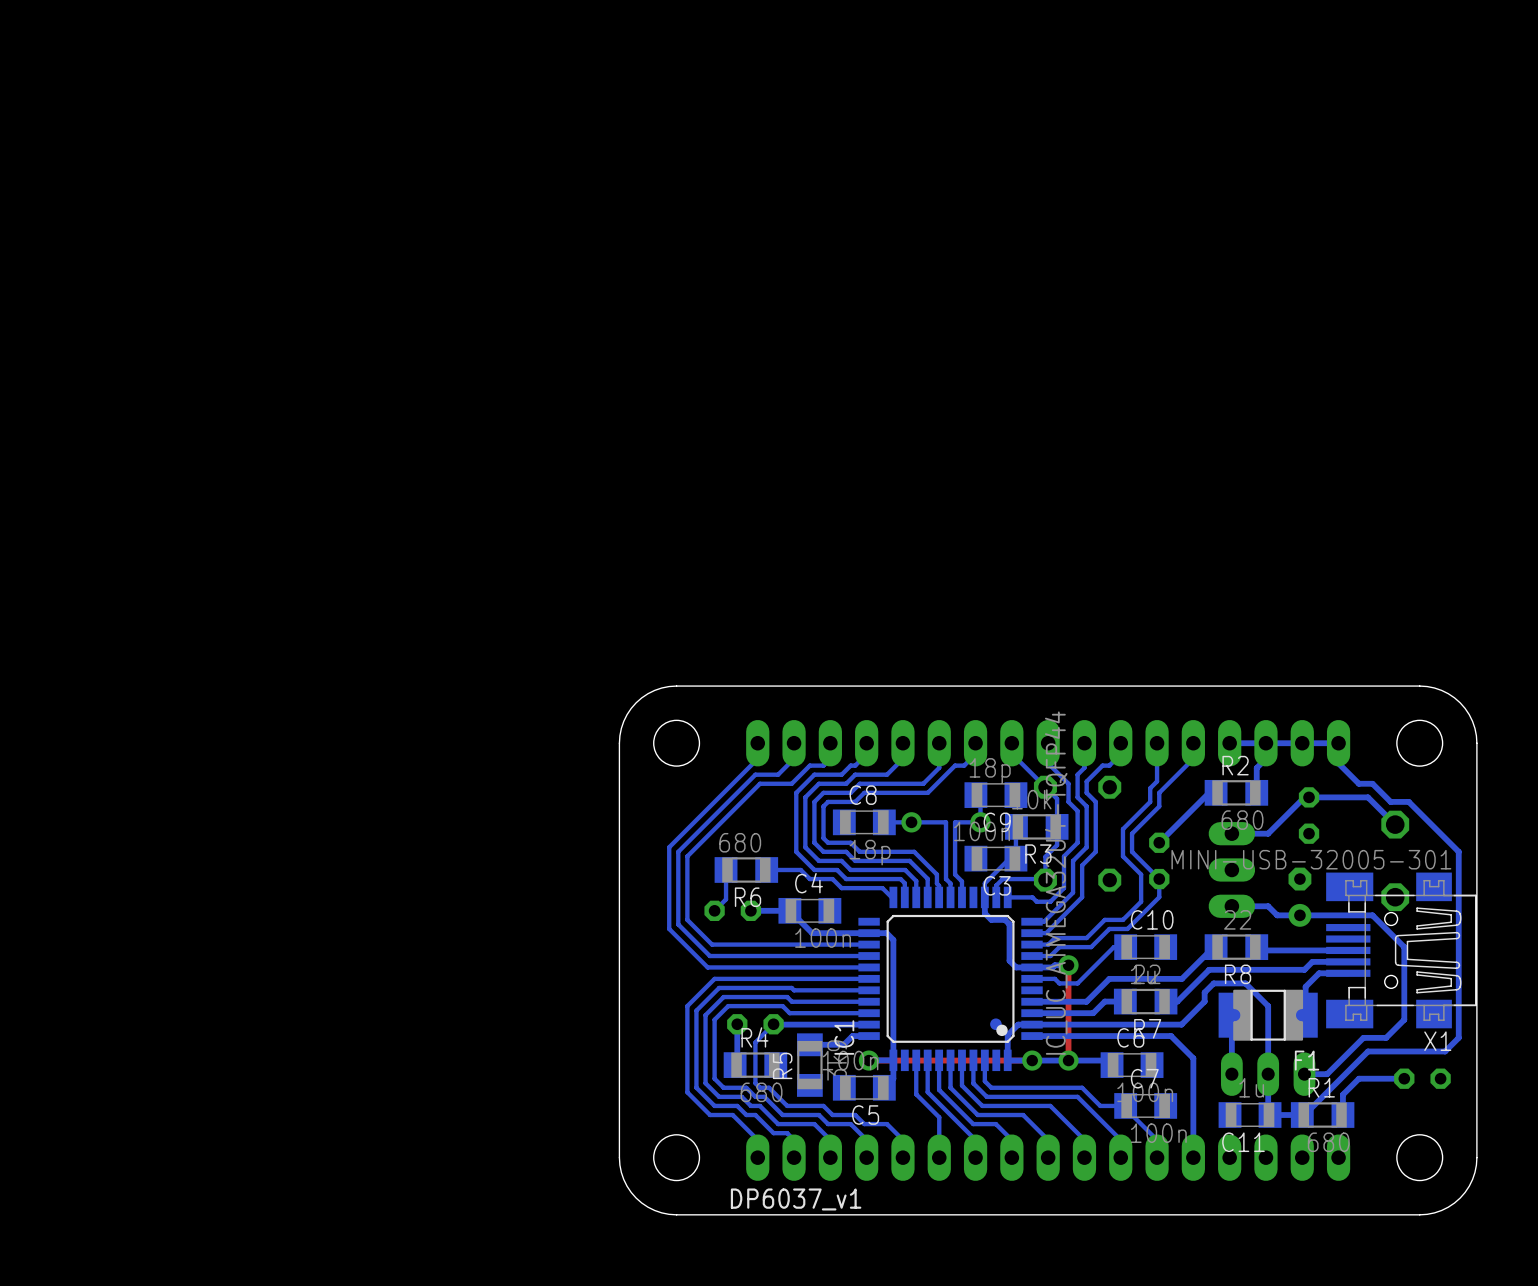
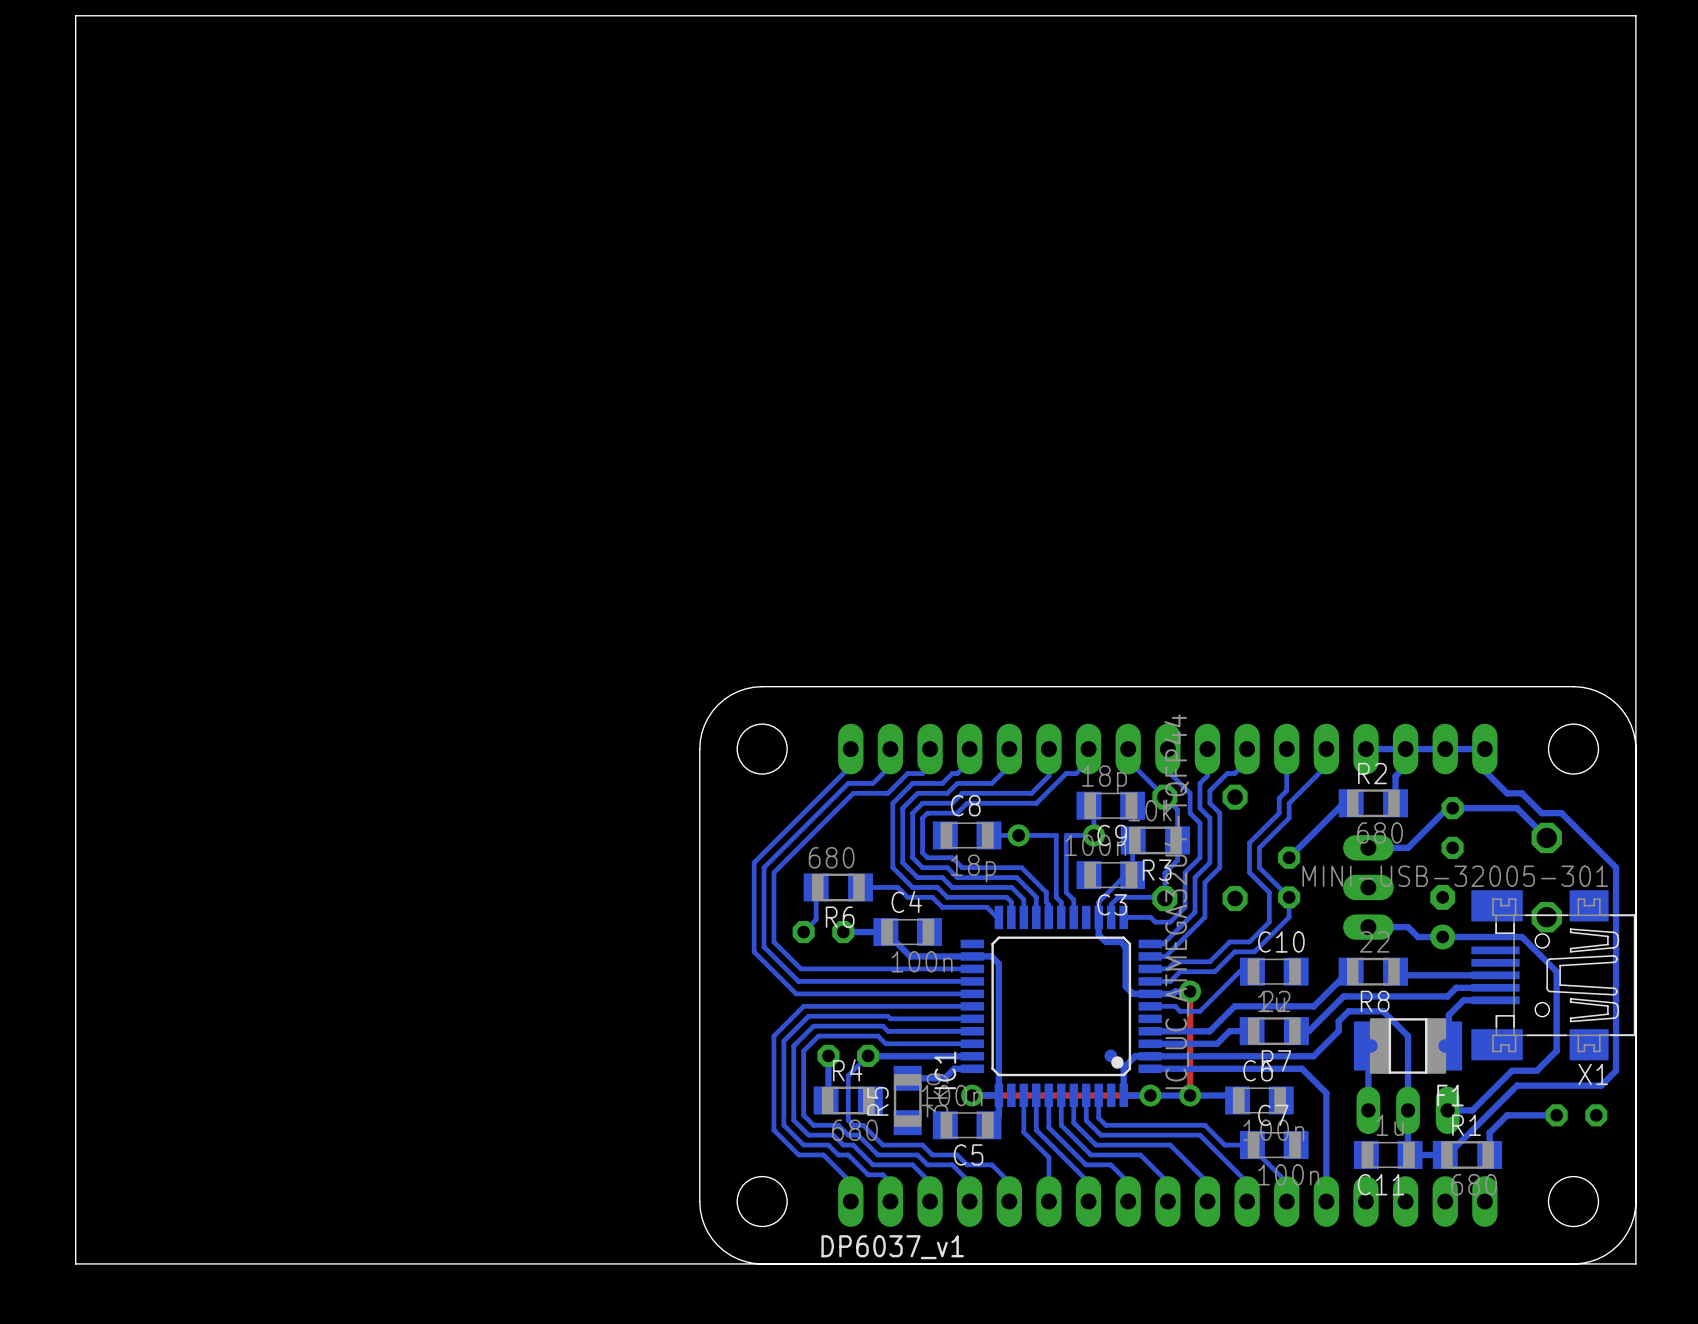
board edge: none -> (1635, 15) (75, 15) (75, 1263) (1635, 1263) (1635, 15)

